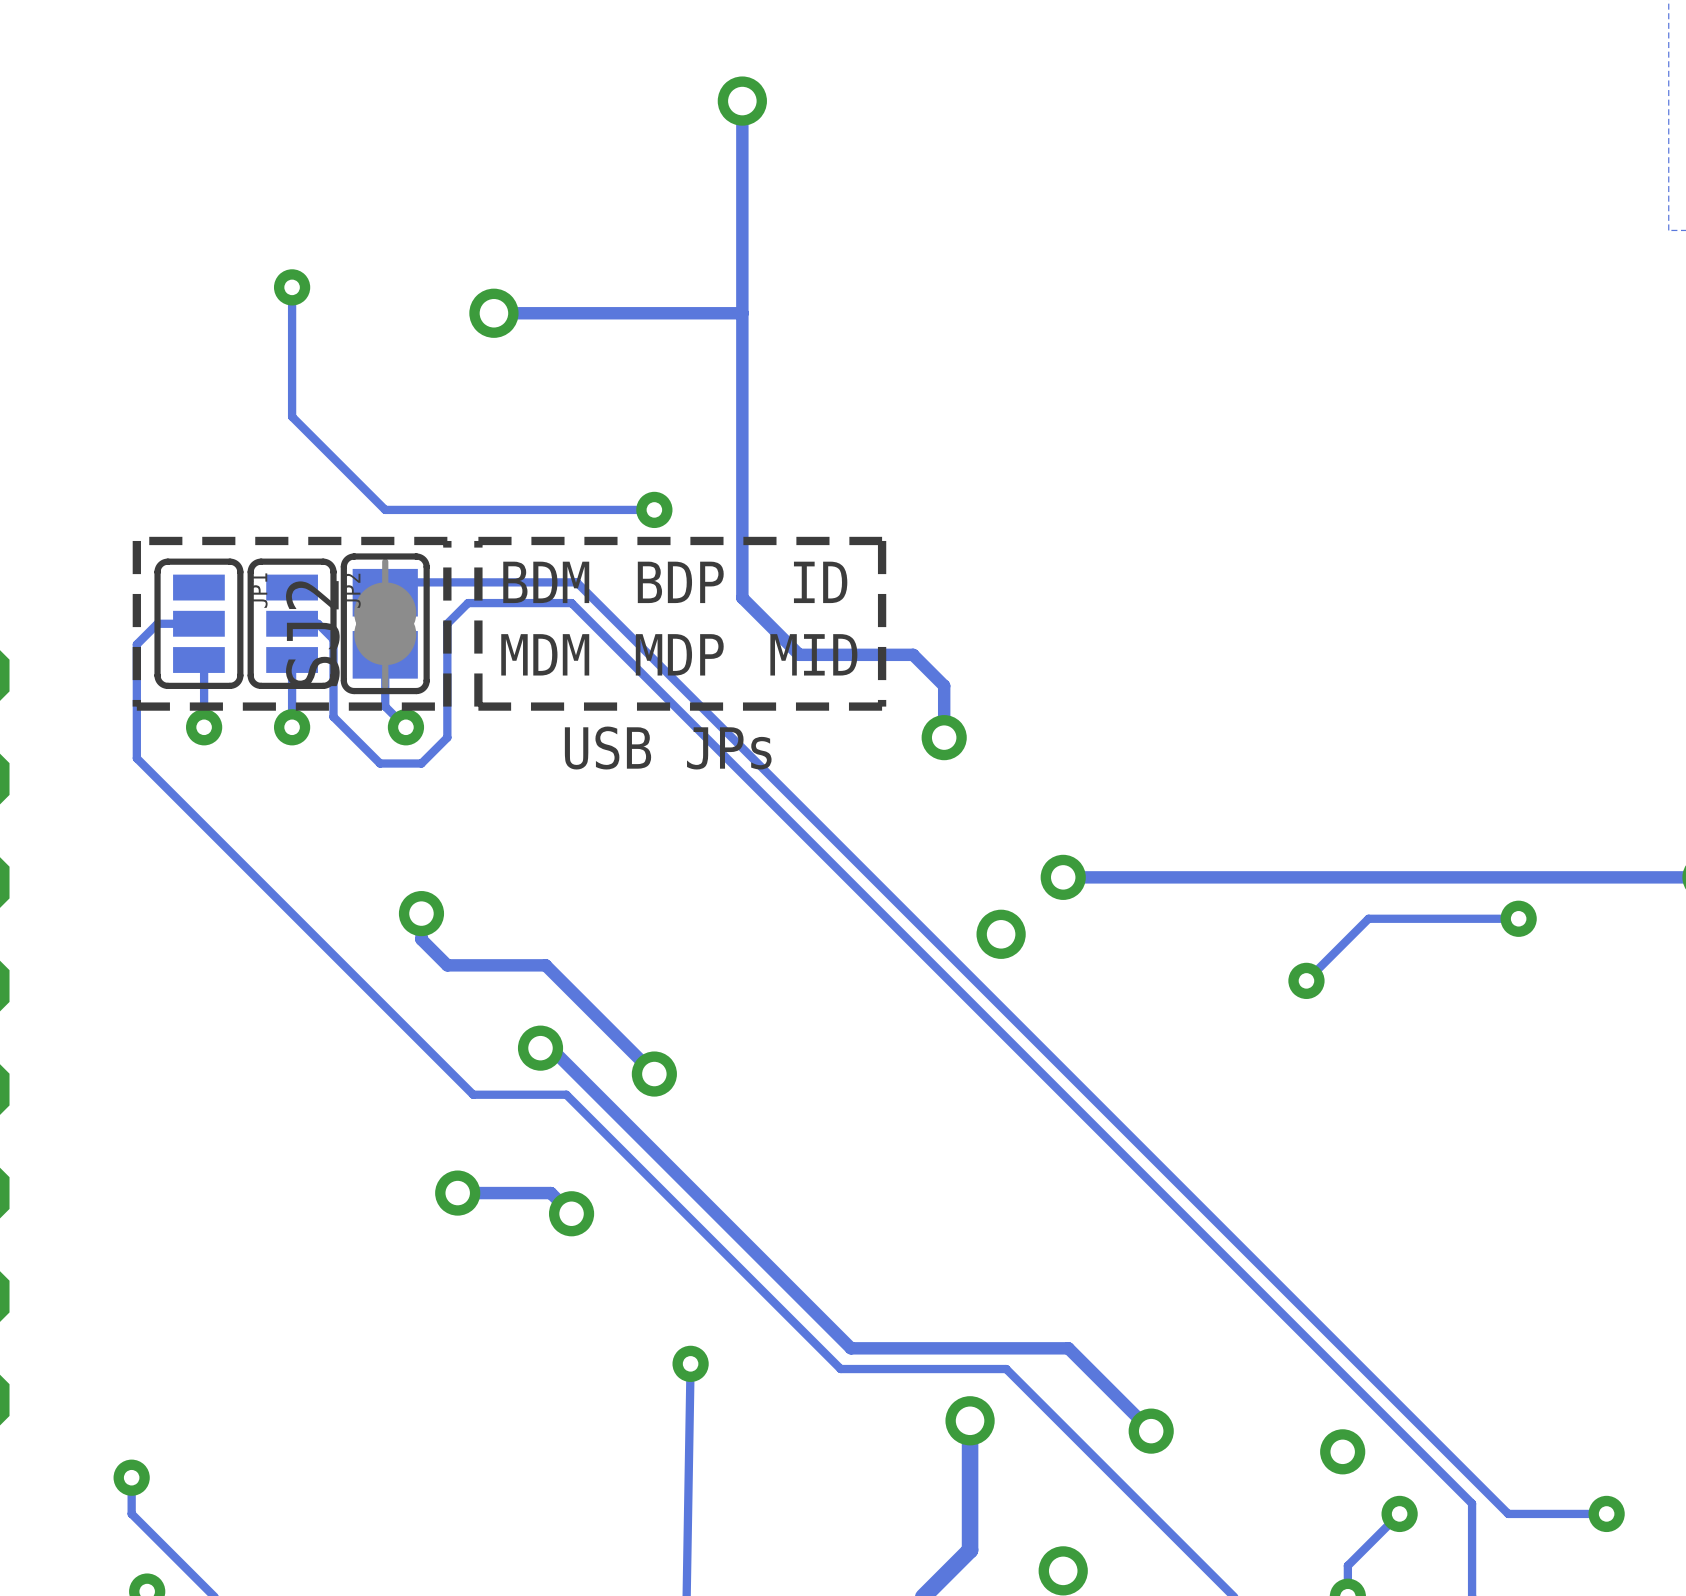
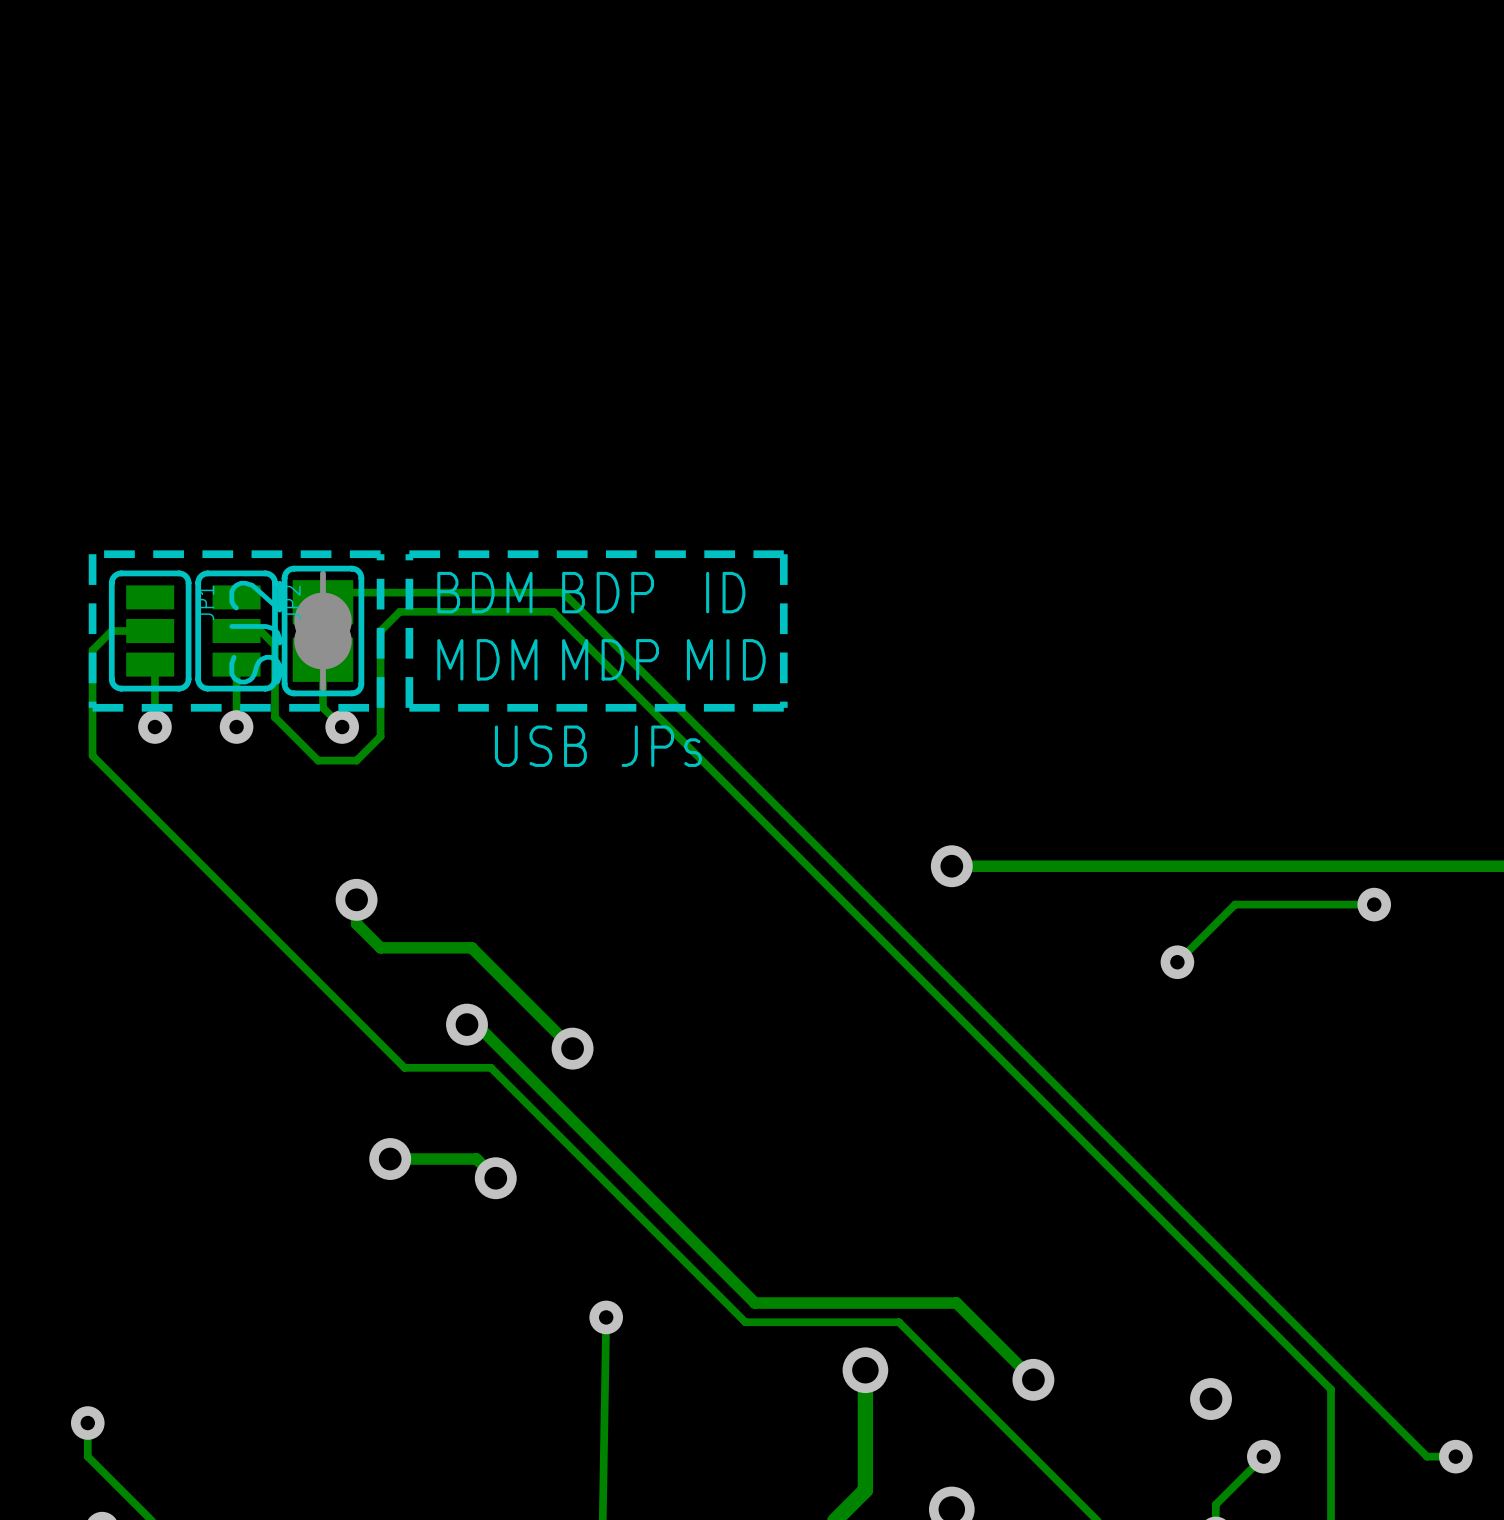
track: (742, 101) (742, 597) (799, 654) (913, 654) (944, 685) (944, 737) -> none
via: (742, 101) -> none
track: (292, 287) (292, 416) (385, 509) (654, 509) -> none
via: (292, 287) -> none
via: (493, 313) -> none
track: (742, 313) (493, 313) -> none
via: (654, 509) -> none
track: (576, 582) (1508, 1513) (1575, 1513) -> (500, 592) (562, 592) (1427, 1456)
track: (571, 603) (1472, 1503) -> (495, 611) (553, 611) (1331, 1389) (1331, 1447)
via: (944, 737) -> none
via: (1001, 934) -> none

